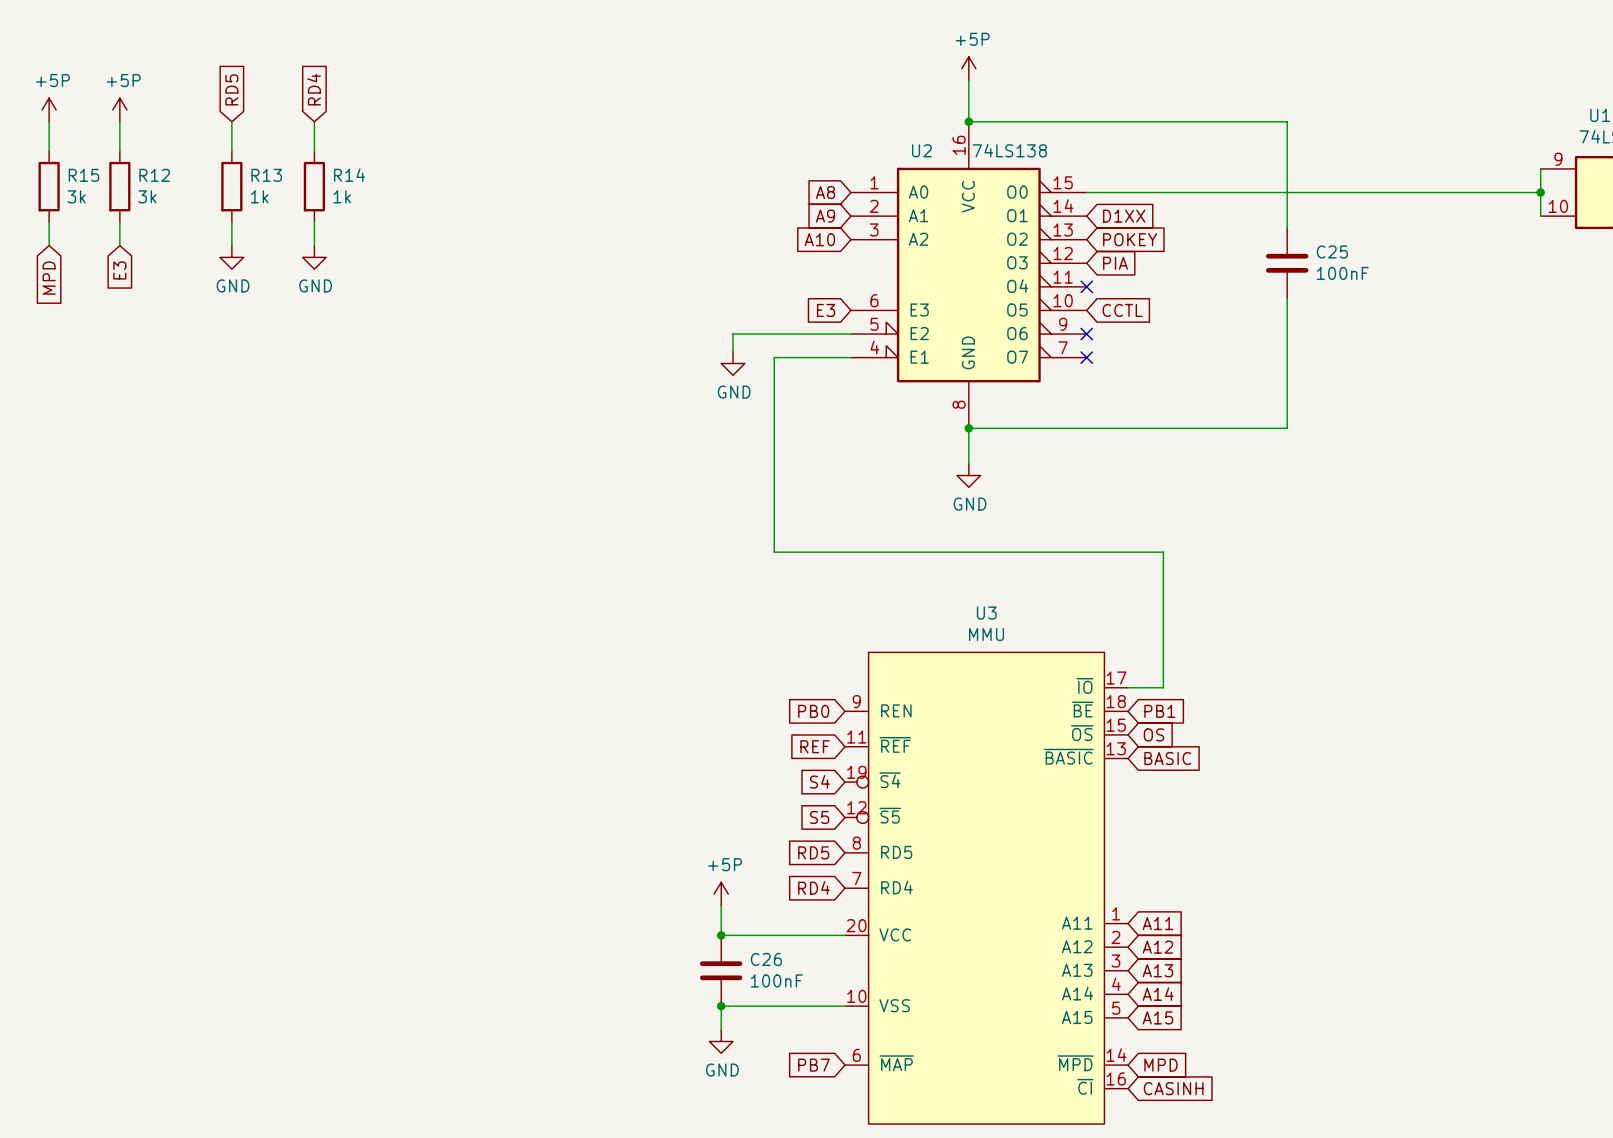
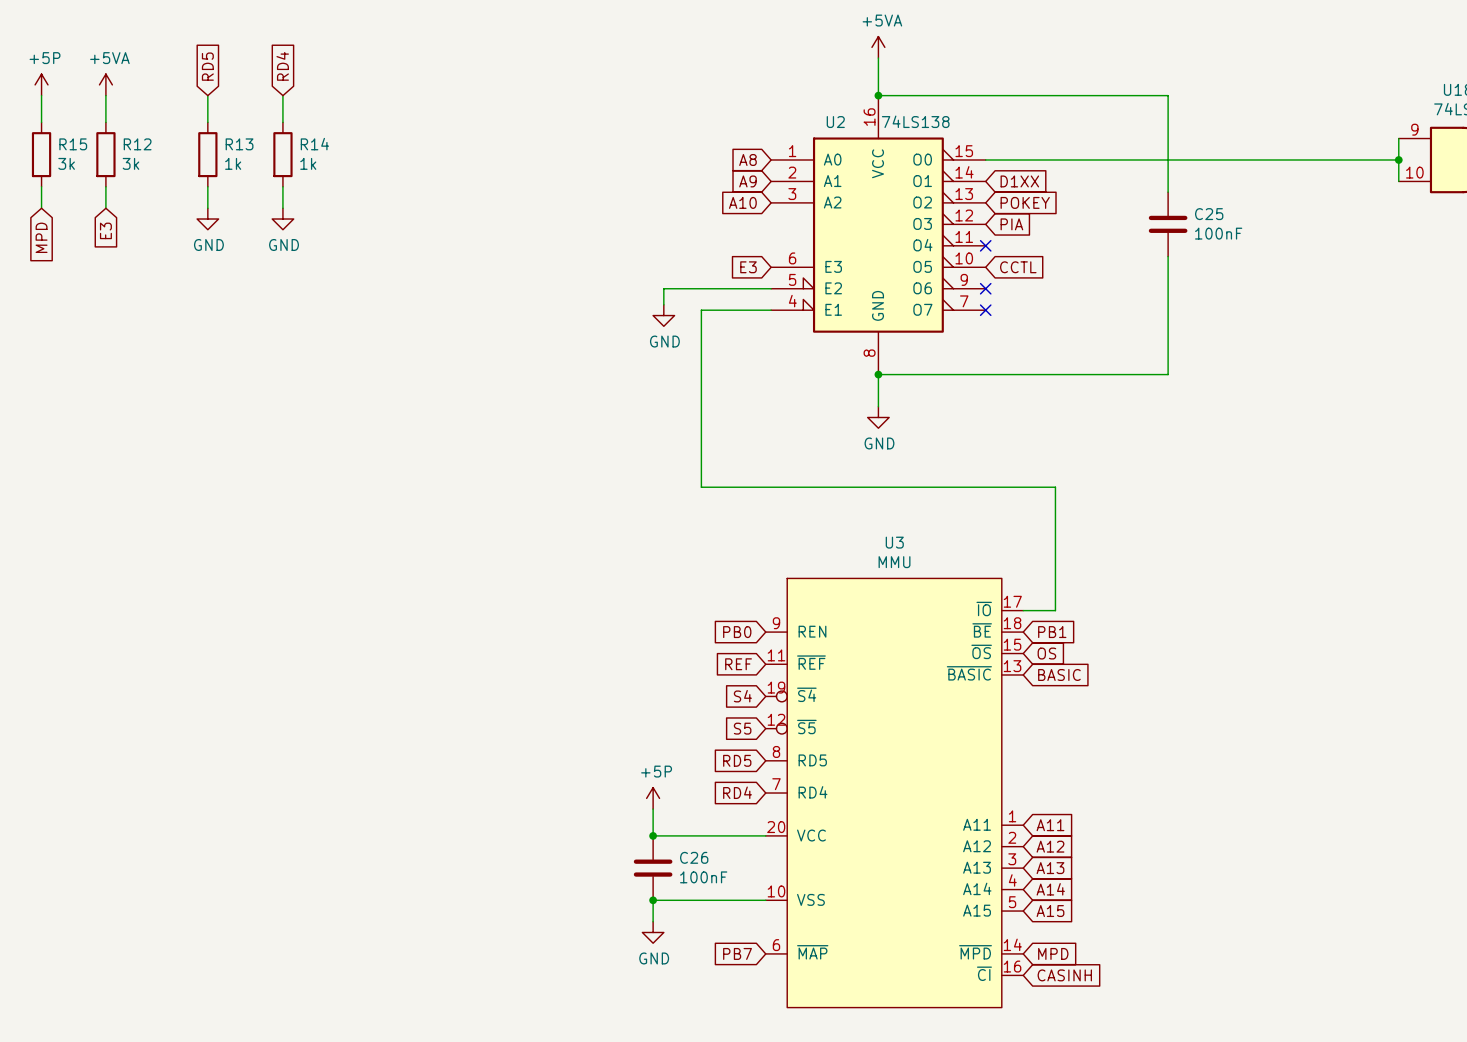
power symbol: +5P (968, 68) -> +5VA (878, 47)
power symbol: +5P (119, 109) -> +5VA (105, 84)

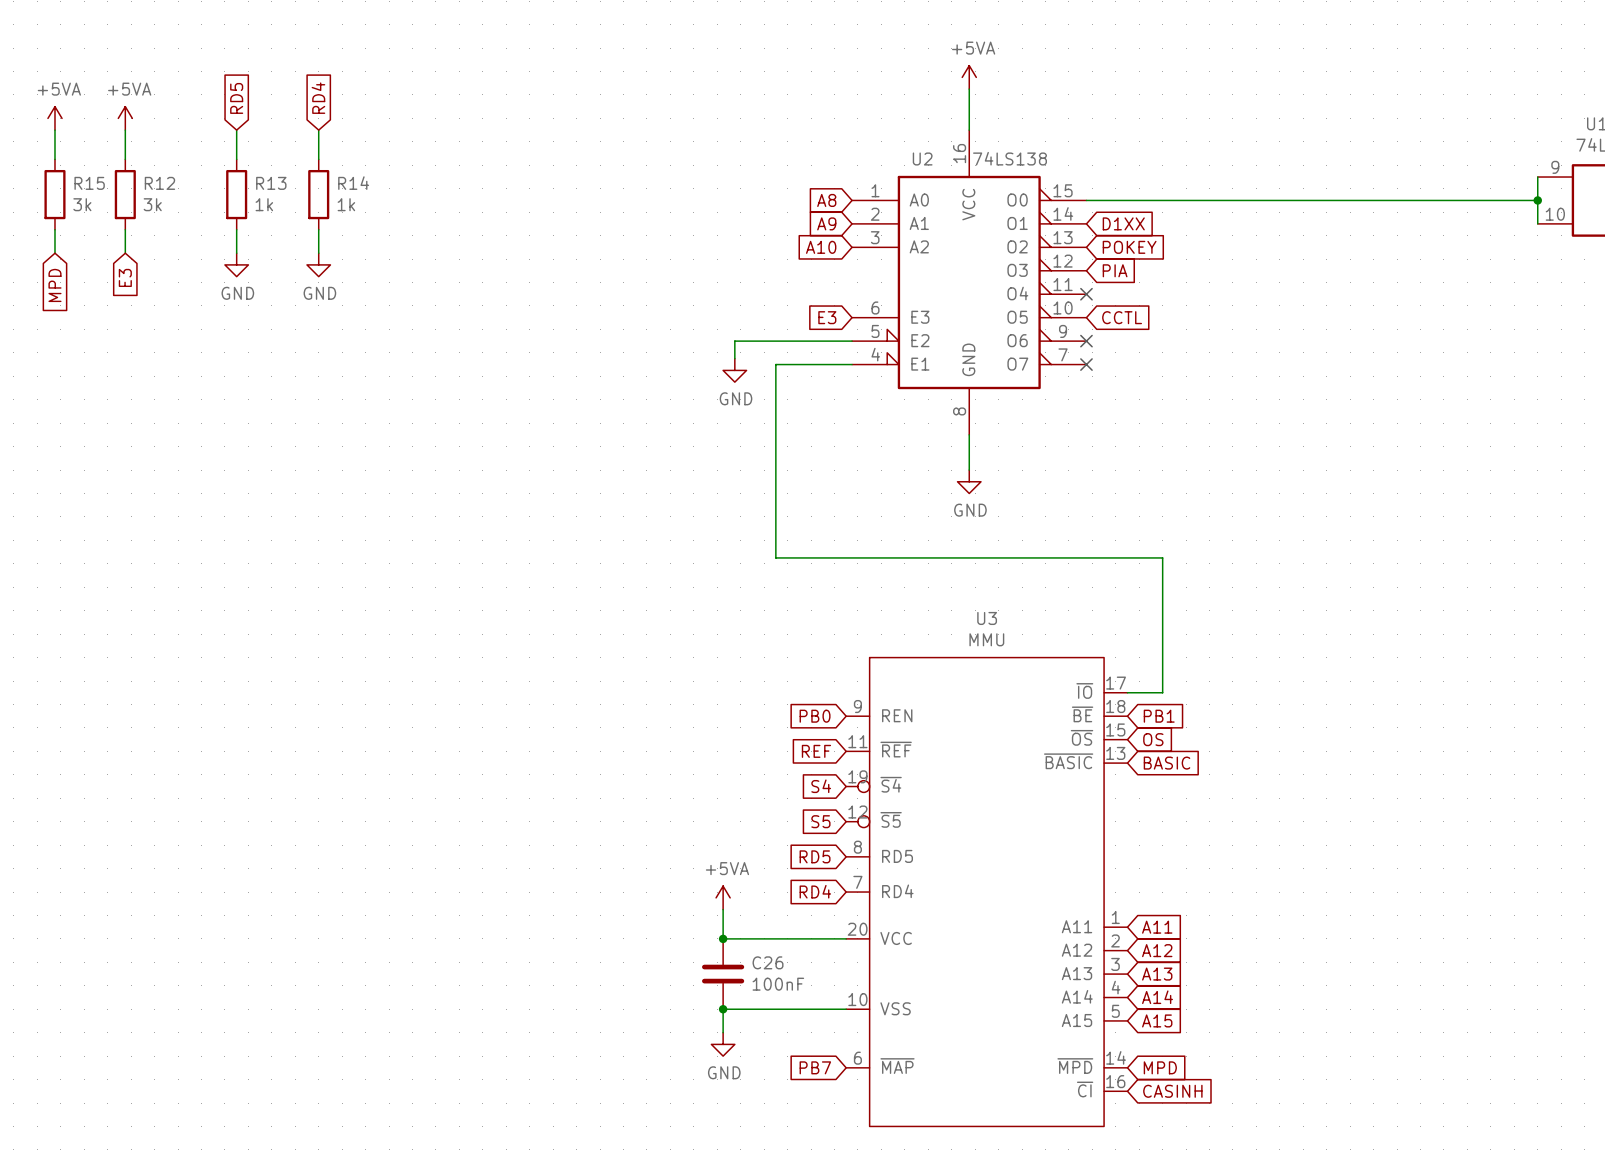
power symbol: +5P (41, 84) -> +5VA (54, 118)
wire: (878, 95) (1168, 95) (1168, 192) -> none
junction: (878, 95) -> none
C25: 100nF (1168, 224) -> none
wire: (1168, 256) (1168, 374) (878, 374) -> none
junction: (878, 374) -> none
power symbol: +5P (653, 798) -> +5VA (723, 897)

